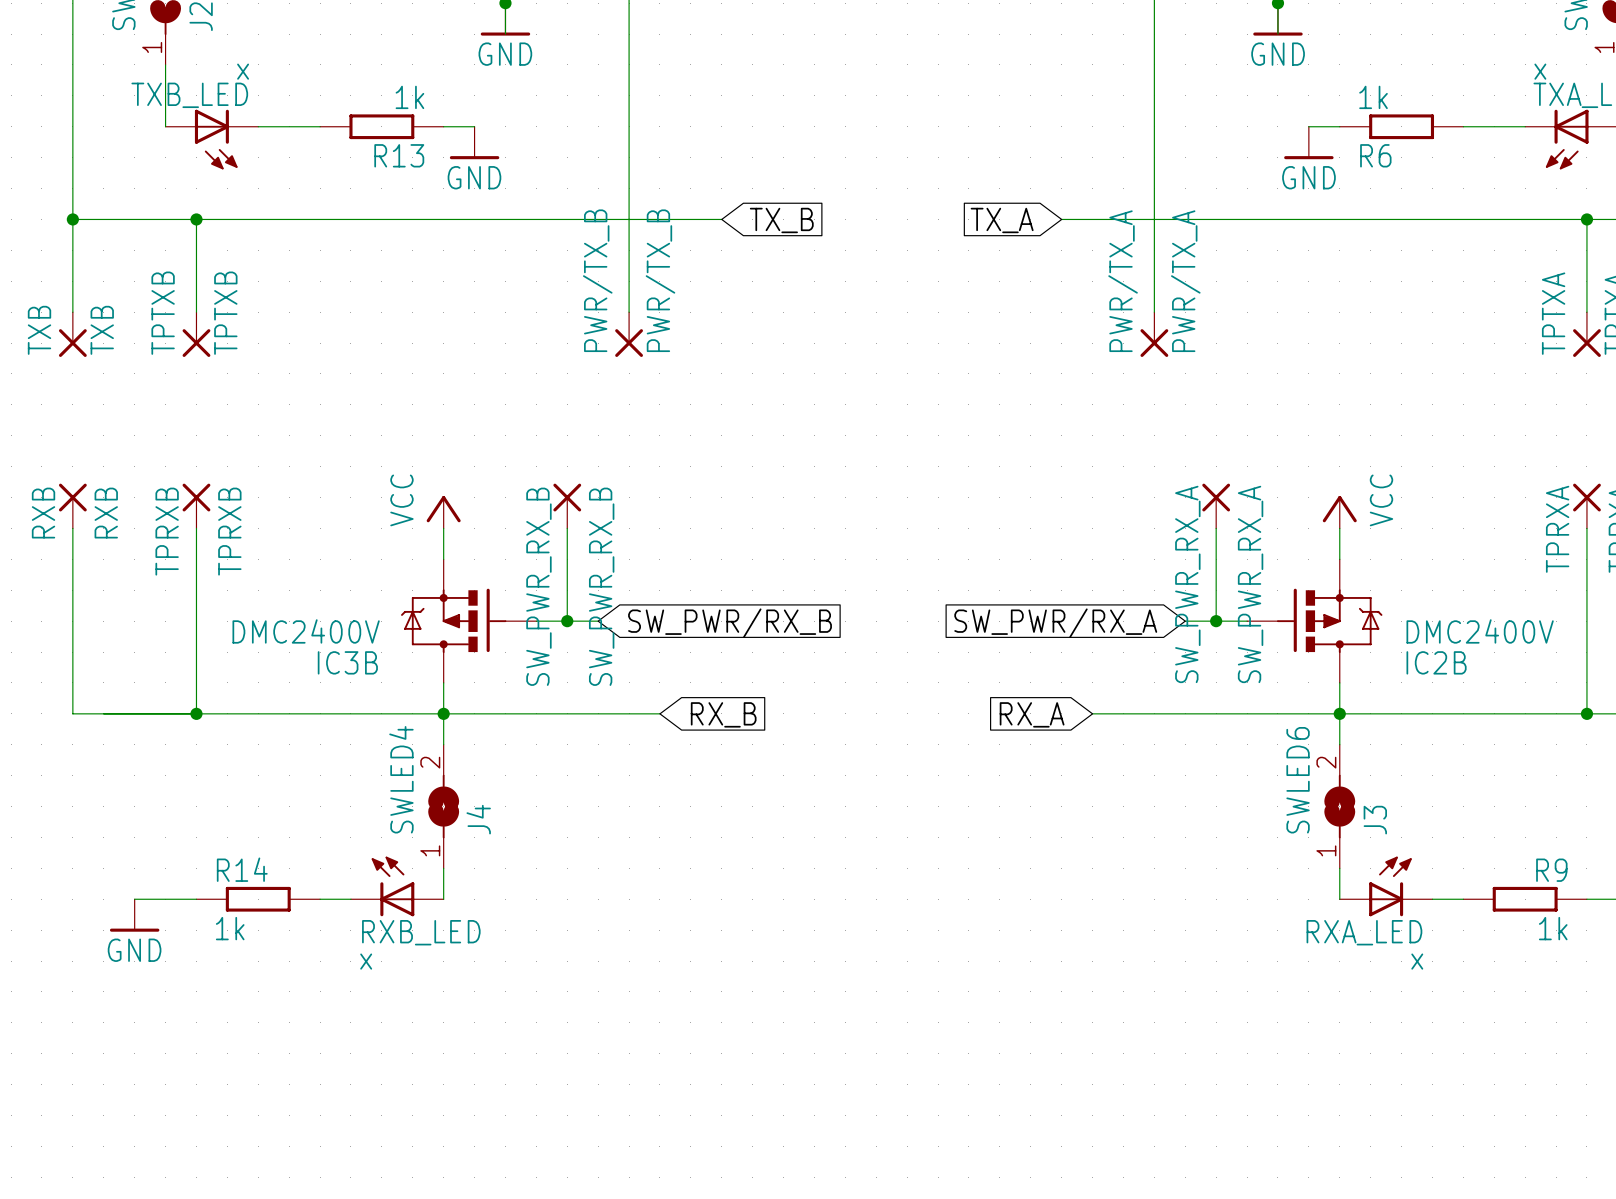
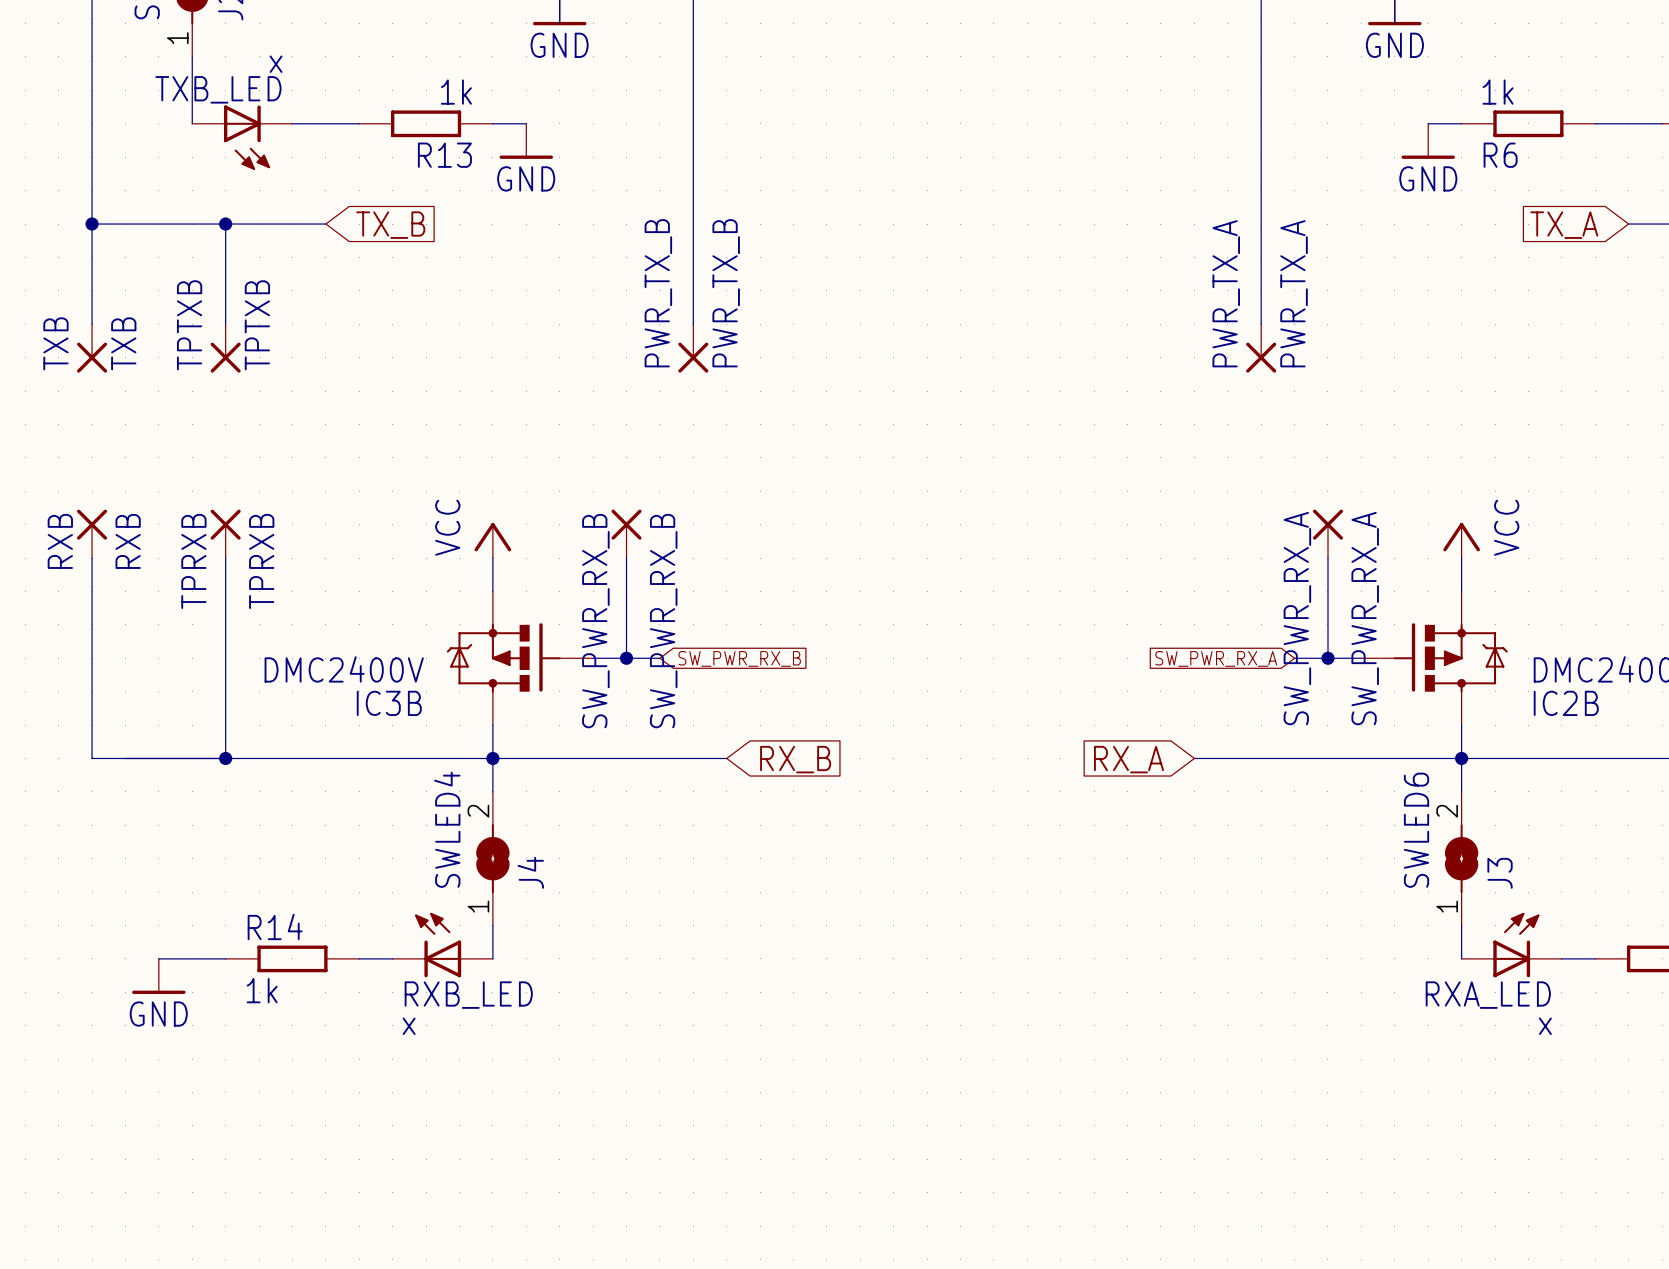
wire: (289, 219) (721, 219) -> none
wire: (1061, 219) (1494, 219) -> none
global label: none -> TX_B (390, 225)
global label: TX_B (781, 220) -> none
global label: TX_A (1002, 220) -> none
global label: none -> TX_A (1564, 225)
PWR/TX_B name: PWR/TX_B (597, 280) -> PWR_TX_B (658, 293)
PWR/TX_B value: PWR/TX_B (660, 280) -> PWR_TX_B (726, 293)
PWR/TX_A name: PWR/TX_A (1123, 281) -> PWR_TX_A (1226, 293)
PWR/TX_A value: PWR/TX_A (1185, 281) -> PWR_TX_A (1294, 293)
global label: SW_PWR/RX_B (730, 623) -> SW_PWR_RX_B (739, 658)
global label: SW_PWR/RX_A (1055, 623) -> SW_PWR_RX_A (1216, 658)

